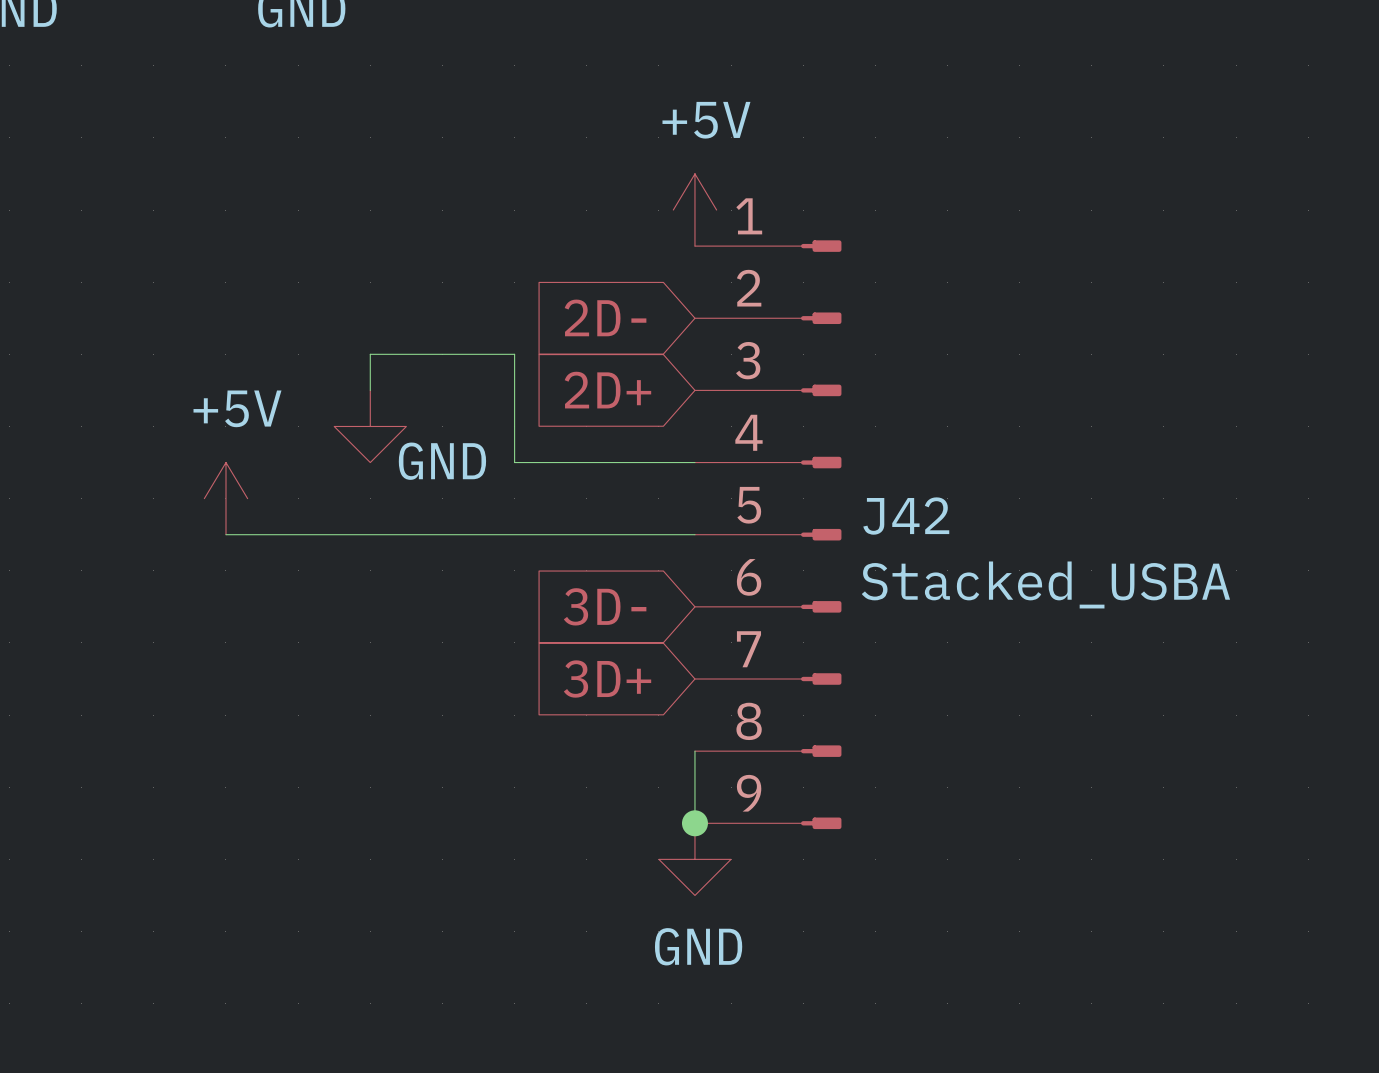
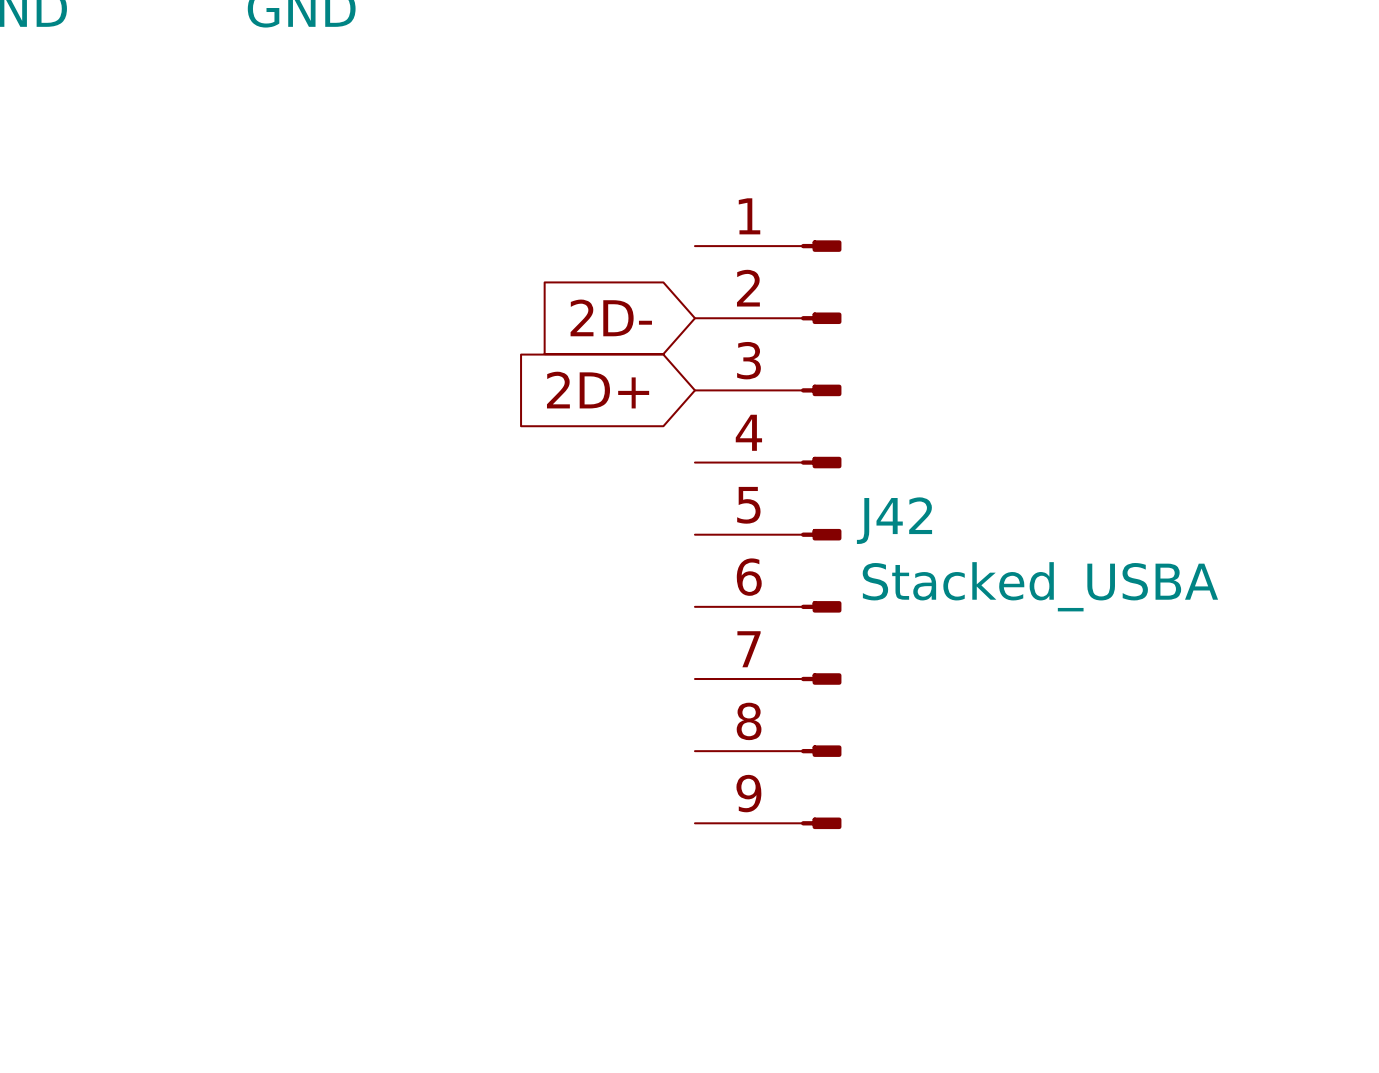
power symbol: +5V (694, 210) -> none
wire: (370, 390) (370, 354) (514, 354) (514, 462) (694, 462) -> none
power symbol: GND (370, 426) -> none
power symbol: +5V (225, 498) -> none
wire: (225, 534) (694, 534) -> none
global label: 3D- (605, 606) -> none
global label: 3D+ (607, 679) -> none
wire: (694, 751) (694, 823) -> none
junction: (694, 823) -> none
power symbol: GND (694, 859) -> none

